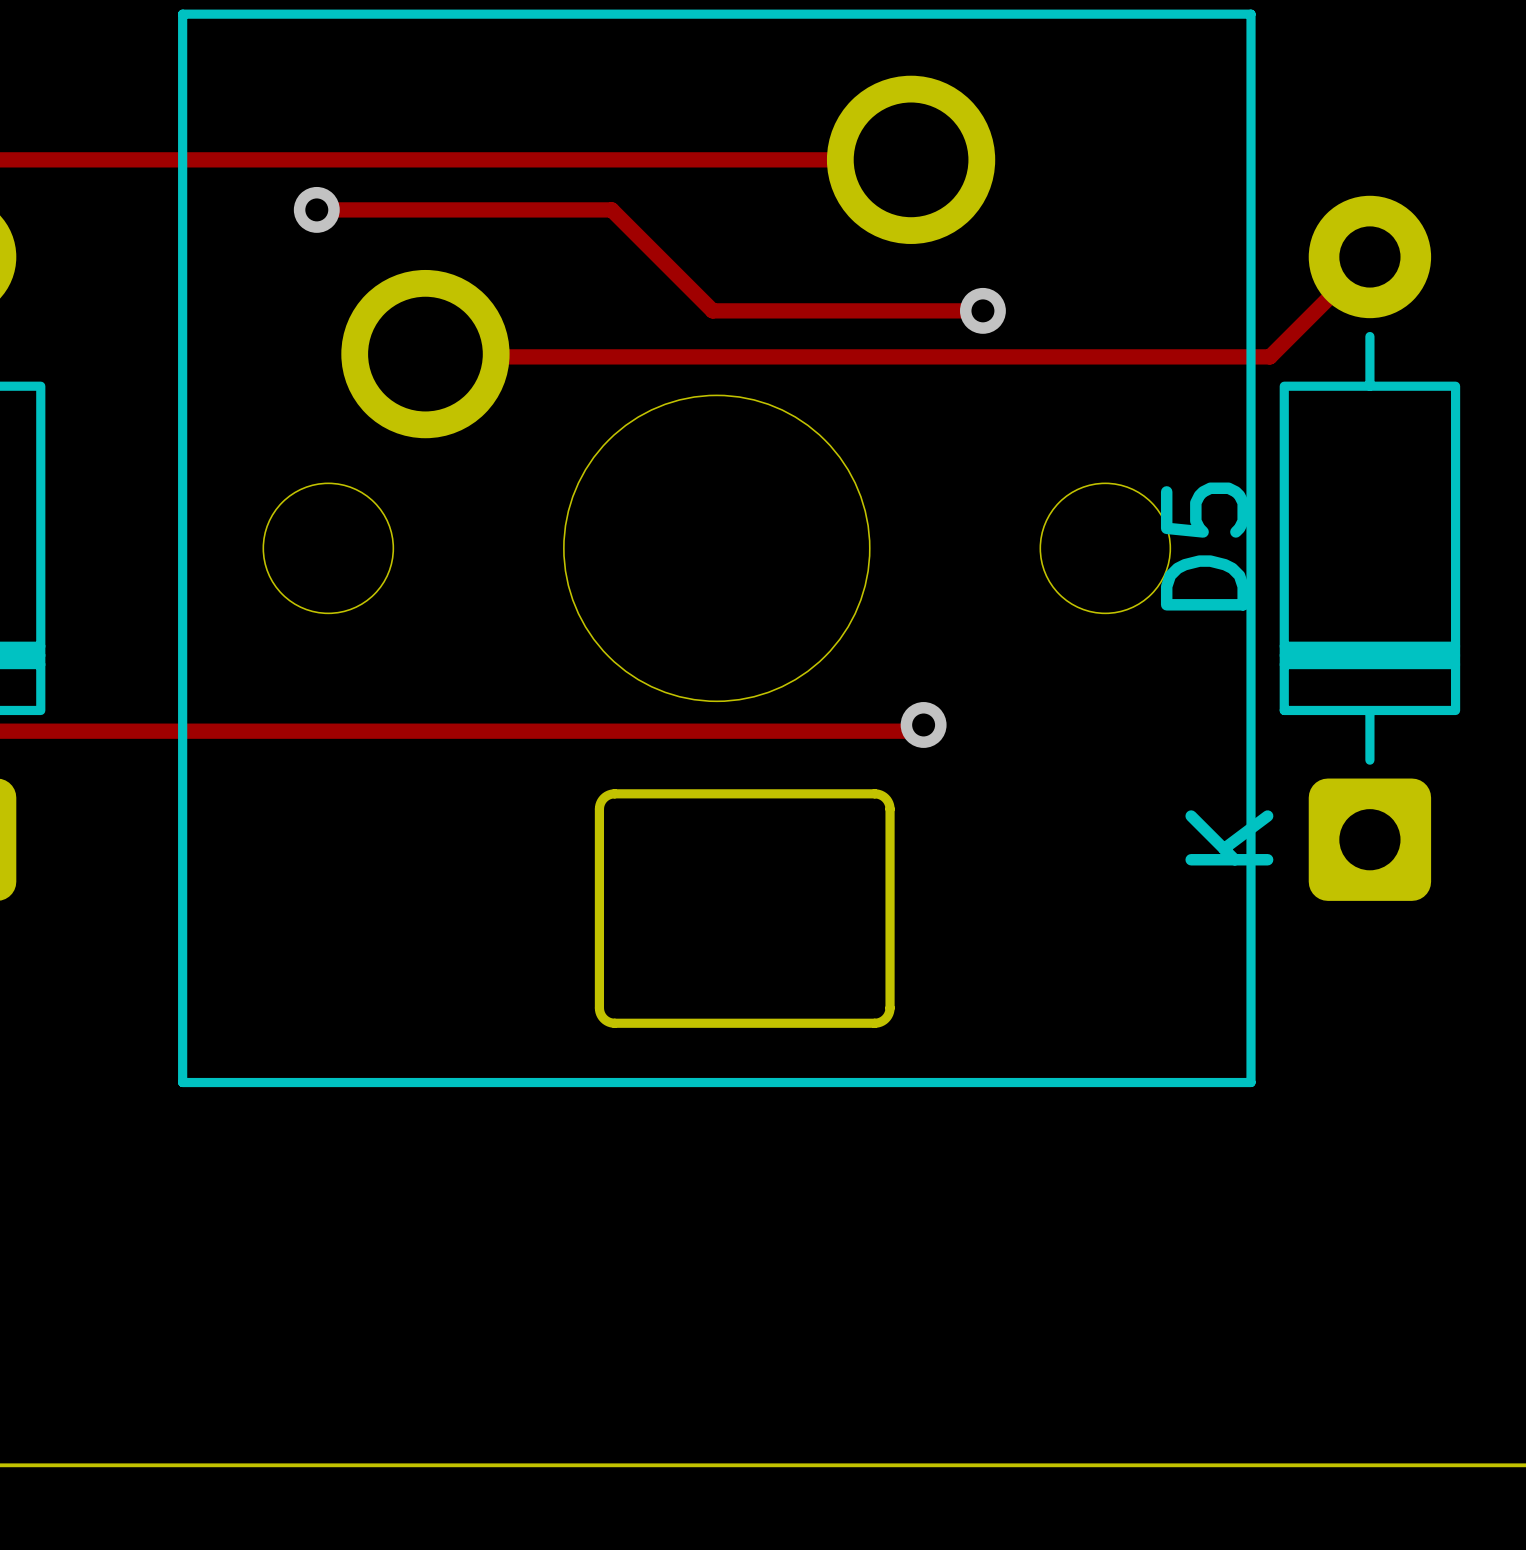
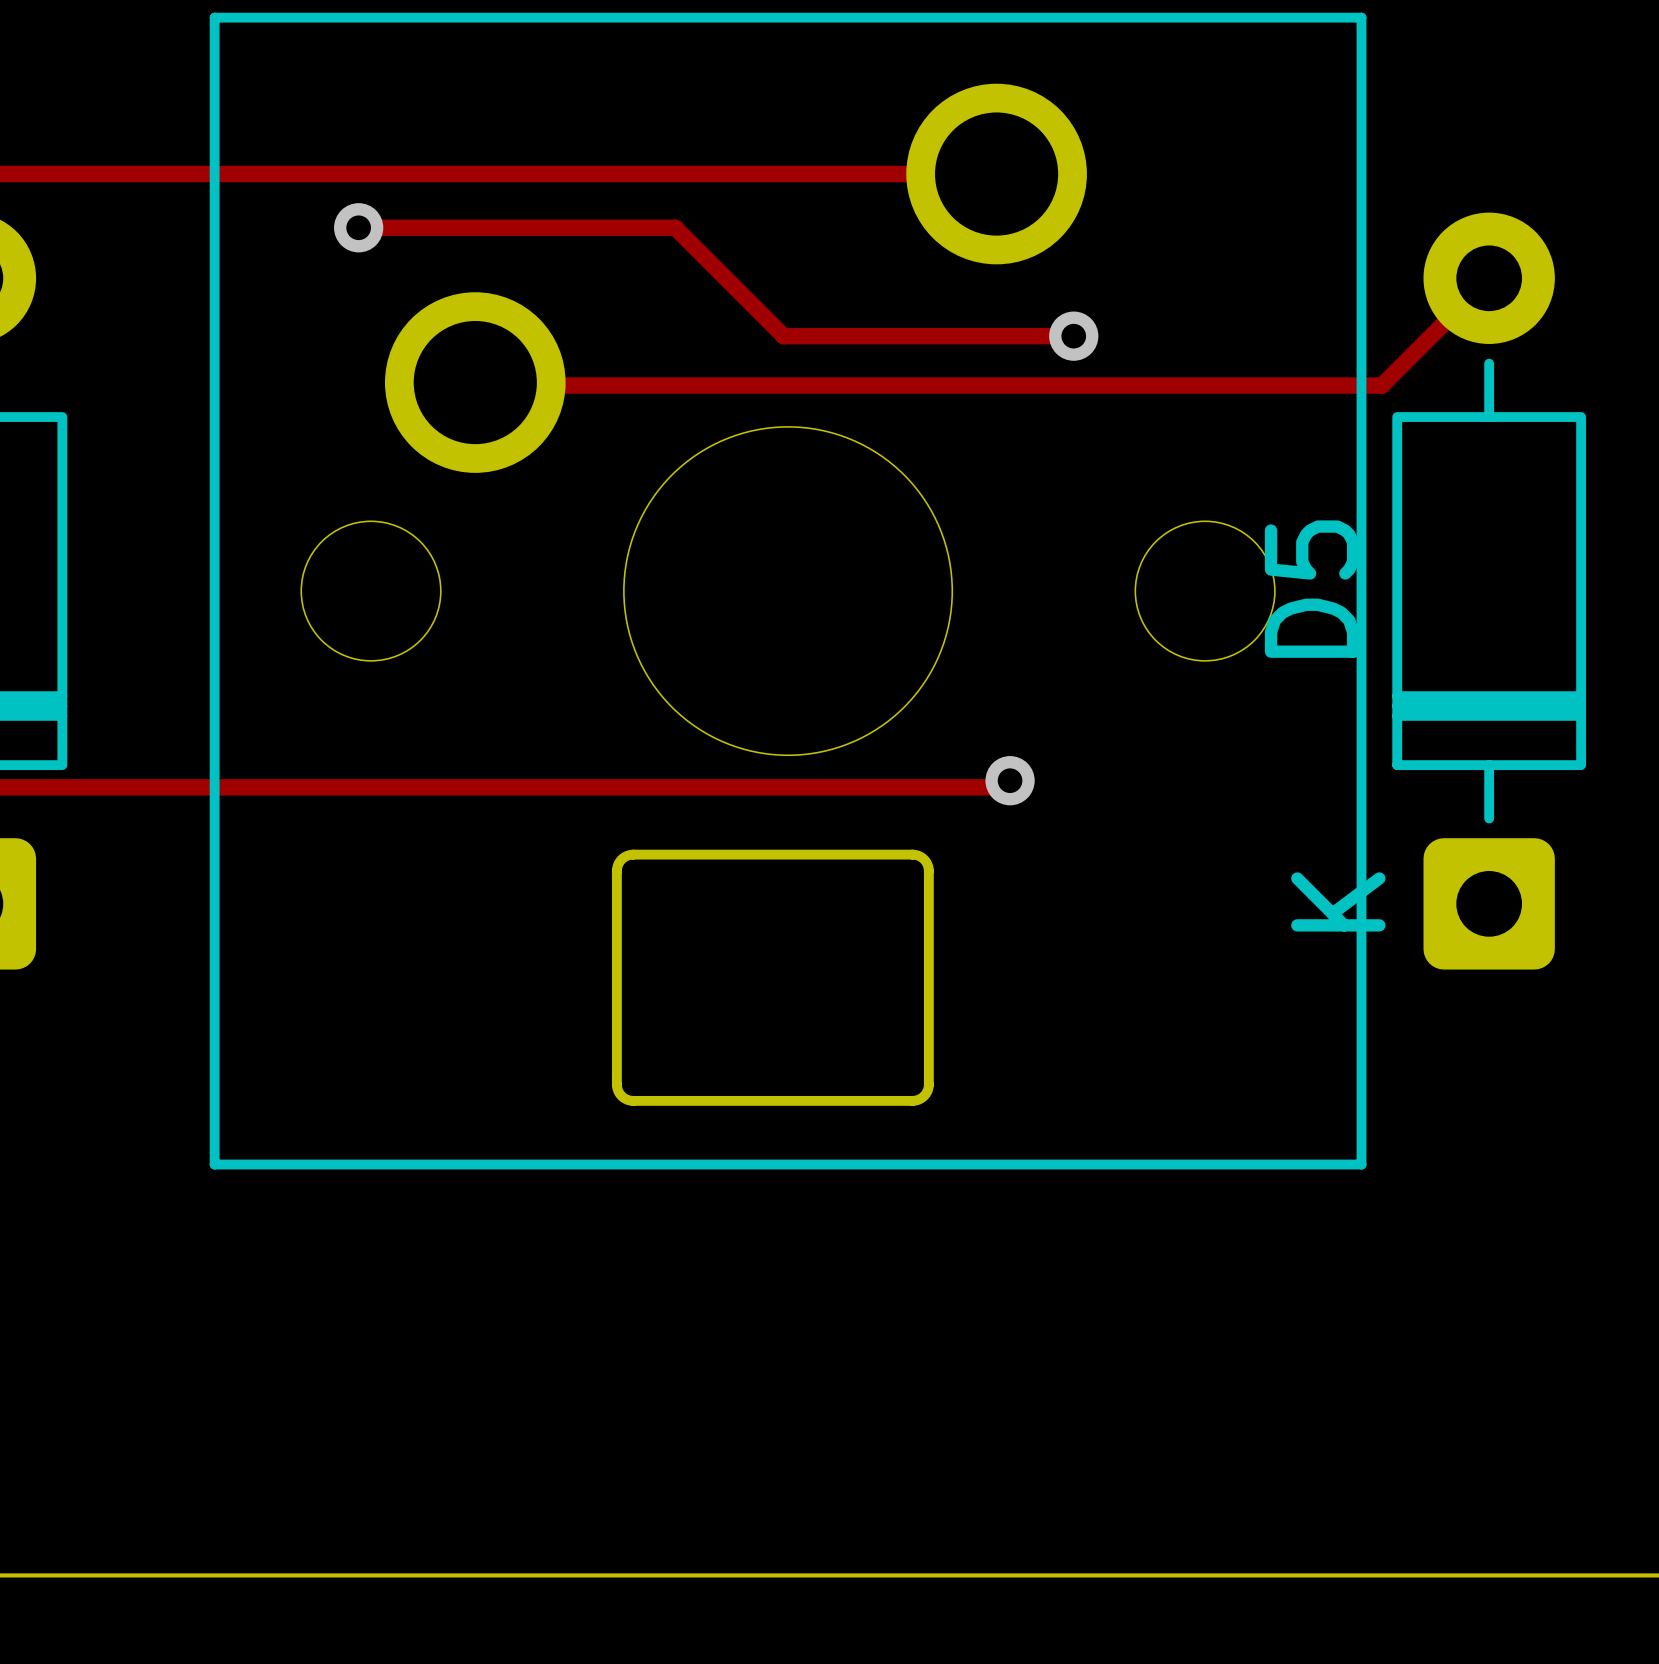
part position: (744, 908) -> (772, 977)

